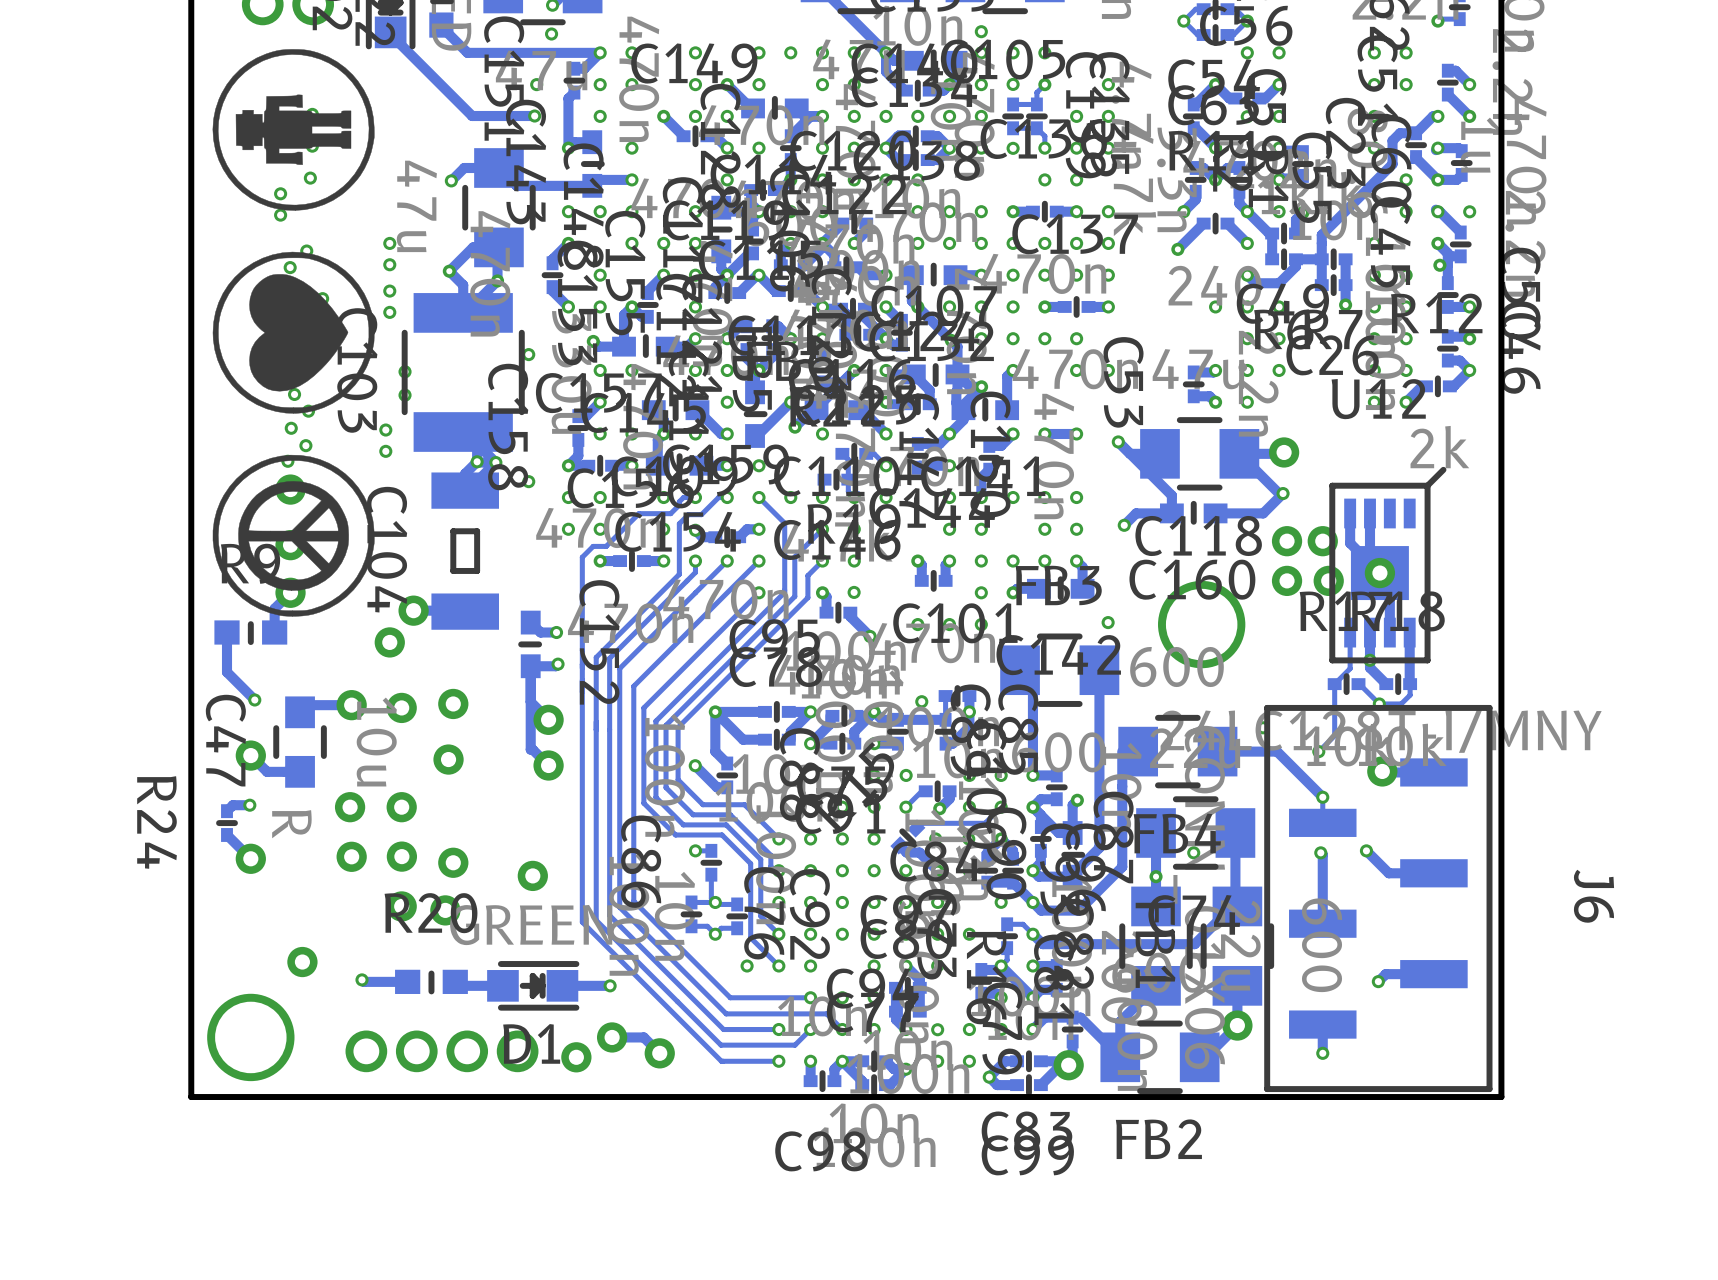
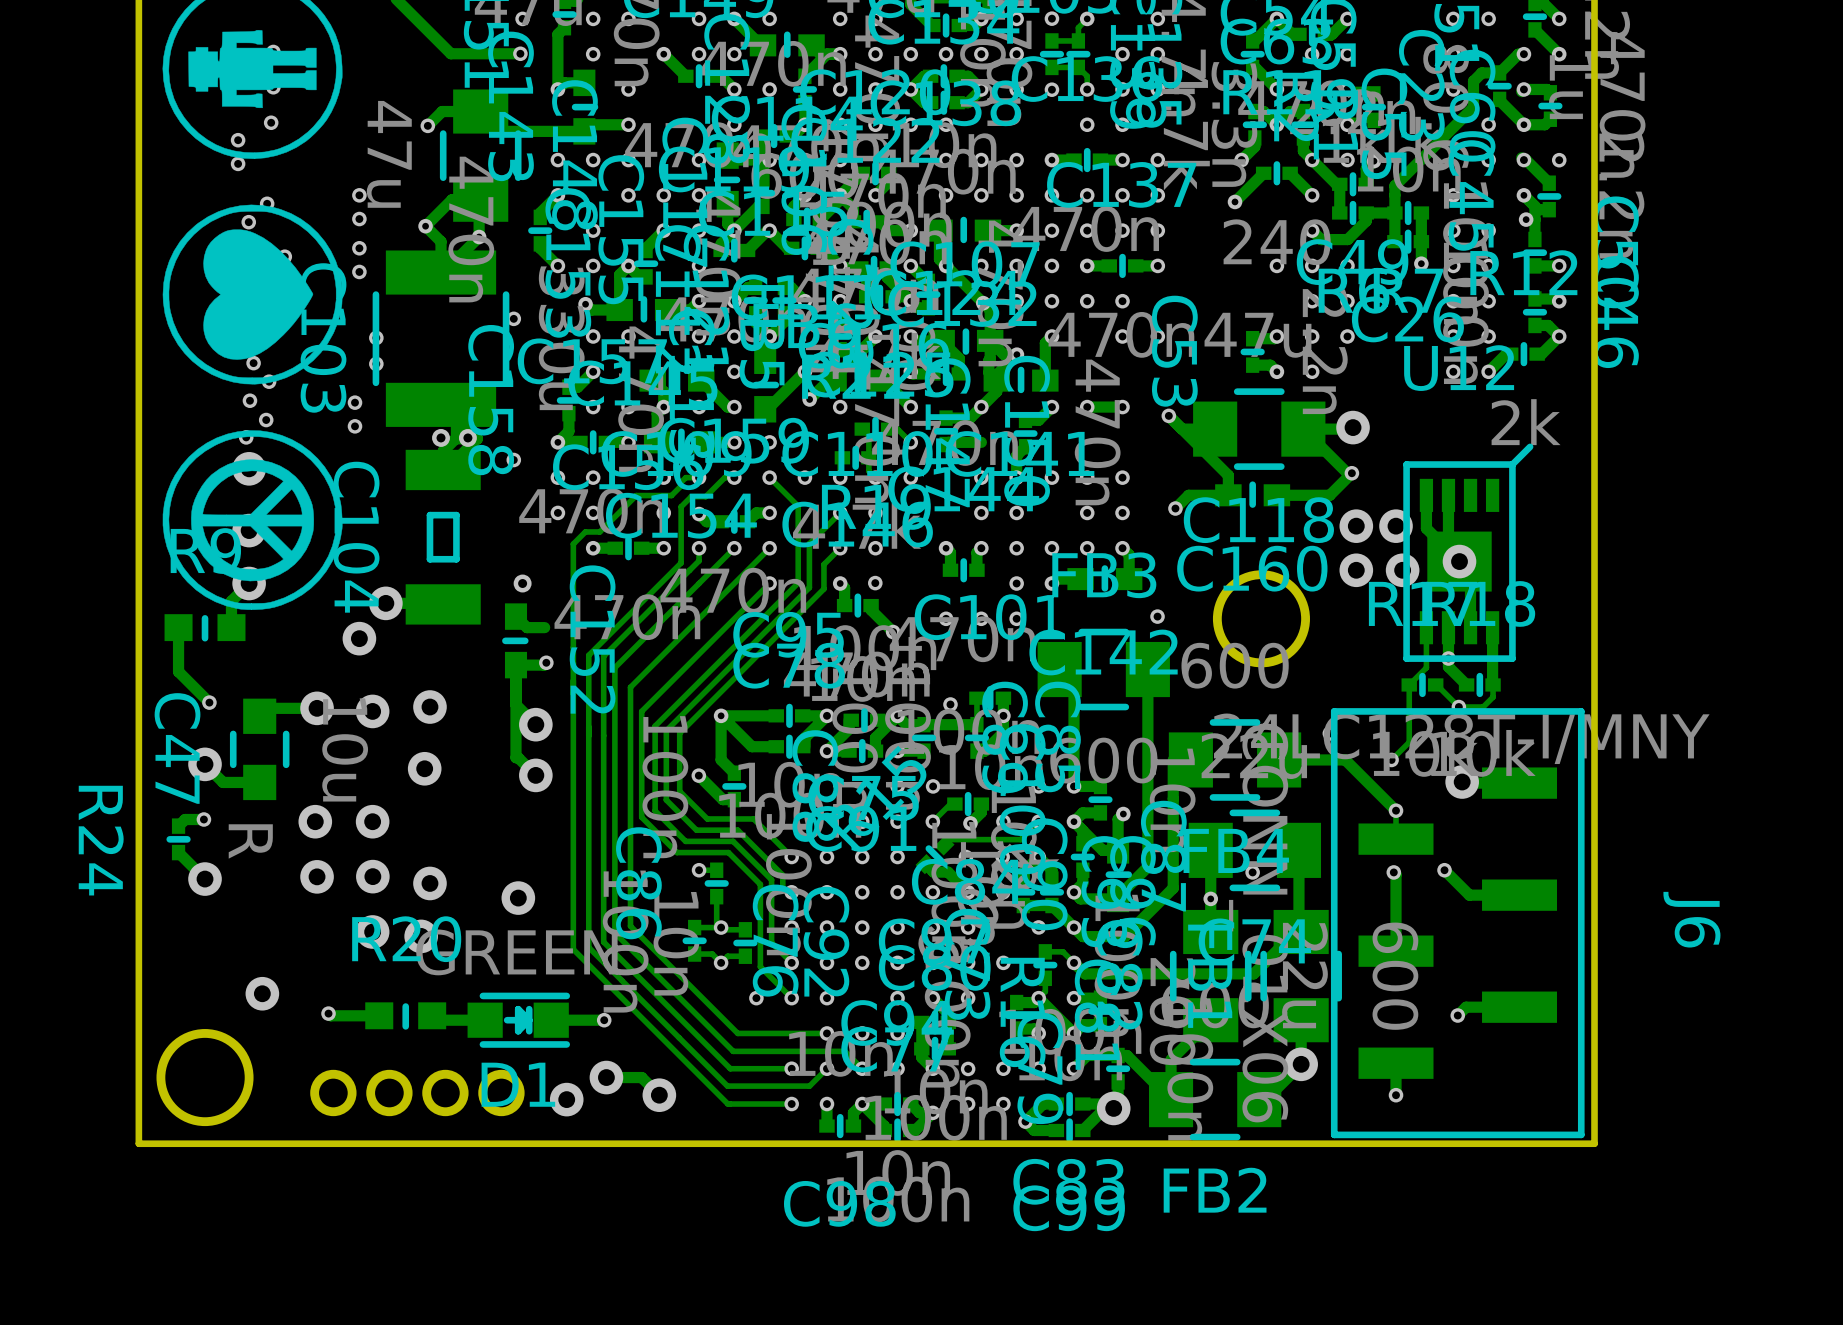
via: none -> (441, 437)
via: (477, 461) -> none
via: none -> (467, 437)
via: (495, 462) -> none
via: (949, 465) -> none
via: none -> (522, 583)
via: (556, 632) -> none

